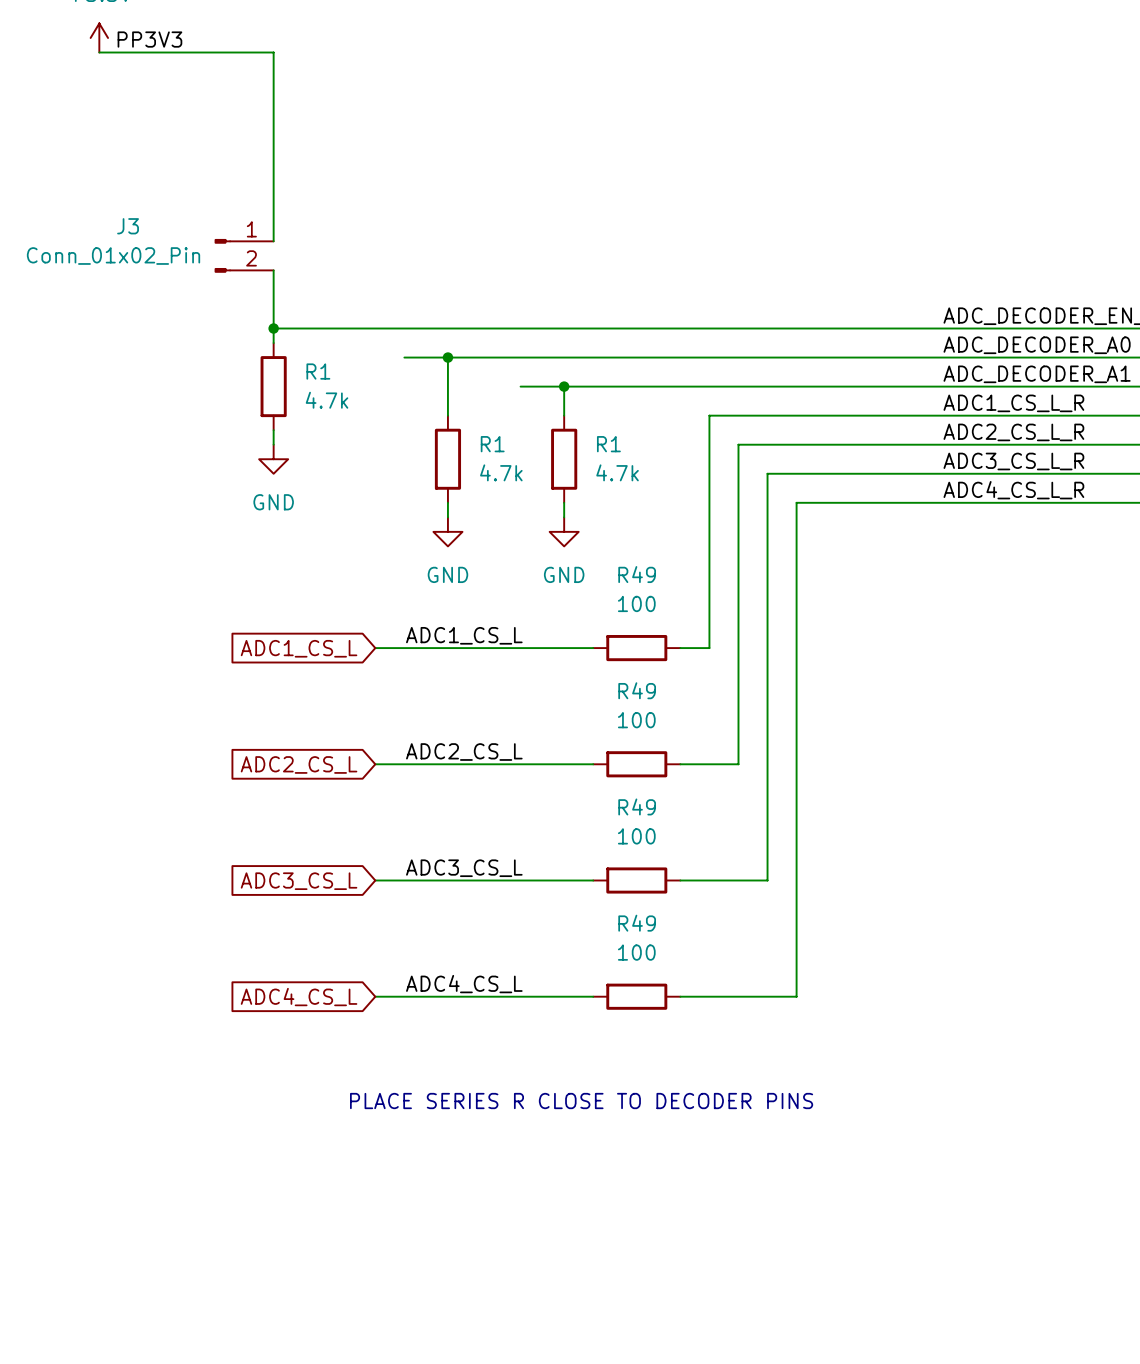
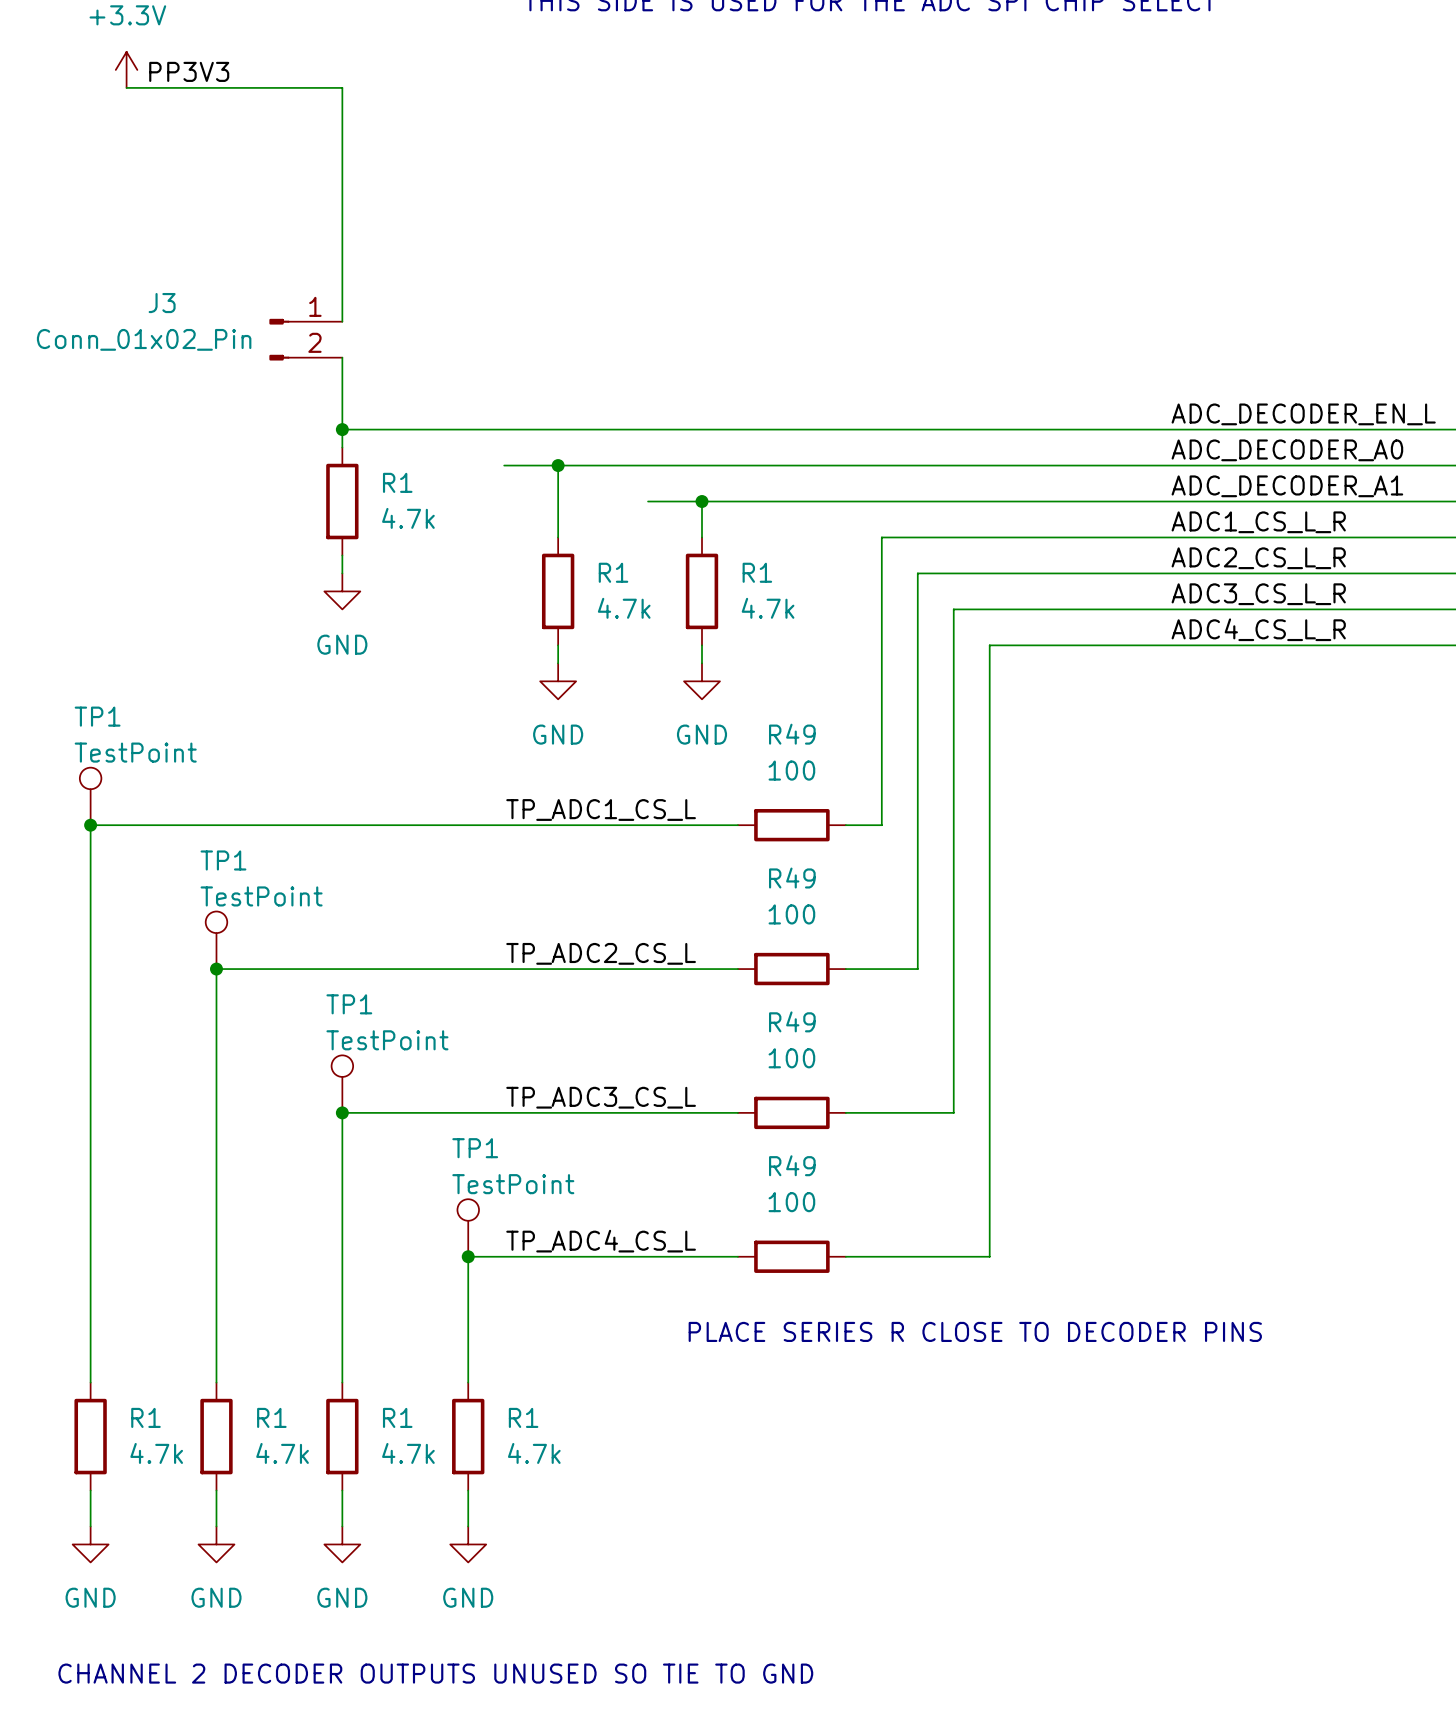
TP1: none -> TestPoint (90, 796)
label: ADC1_CS_L (464, 635) -> TP_ADC1_CS_L (601, 810)
junction: none -> (90, 825)
global label: ADC1_CS_L (299, 648) -> none
wire: none -> (468, 825) (90, 825) (90, 1382)
TP1: none -> TestPoint (216, 940)
label: ADC2_CS_L (464, 752) -> TP_ADC2_CS_L (601, 953)
junction: none -> (216, 969)
global label: ADC2_CS_L (299, 764) -> none
wire: none -> (468, 969) (216, 969) (216, 1382)
TP1: none -> TestPoint (342, 1084)
label: ADC3_CS_L (464, 868) -> TP_ADC3_CS_L (601, 1097)
junction: none -> (342, 1112)
wire: none -> (468, 1112) (342, 1112) (342, 1382)
global label: ADC3_CS_L (299, 881) -> none
TP1: none -> TestPoint (468, 1227)
label: ADC4_CS_L (464, 984) -> TP_ADC4_CS_L (601, 1241)
wire: none -> (468, 1256) (468, 1382)
junction: none -> (468, 1256)
global label: ADC4_CS_L (299, 997) -> none
text position: PLACE SERIES R CLOSE TO DECODER PINS (581, 1101) -> PLACE SERIES R CLOSE TO DECODER PINS (975, 1331)
R1: none -> 4.7k (90, 1436)
R1: none -> 4.7k (216, 1436)
R1: none -> 4.7k (342, 1436)
R1: none -> 4.7k (468, 1436)
wire: none -> (90, 1490) (90, 1526)
wire: none -> (216, 1490) (216, 1526)
wire: none -> (342, 1490) (342, 1526)
wire: none -> (468, 1490) (468, 1526)
power symbol: none -> GND (90, 1544)
power symbol: none -> GND (216, 1544)
power symbol: none -> GND (342, 1544)
power symbol: none -> GND (468, 1544)
text: none -> CHANNEL 2 DECODER OUTPUTS UNUSED SO TIE TO GND (435, 1673)

